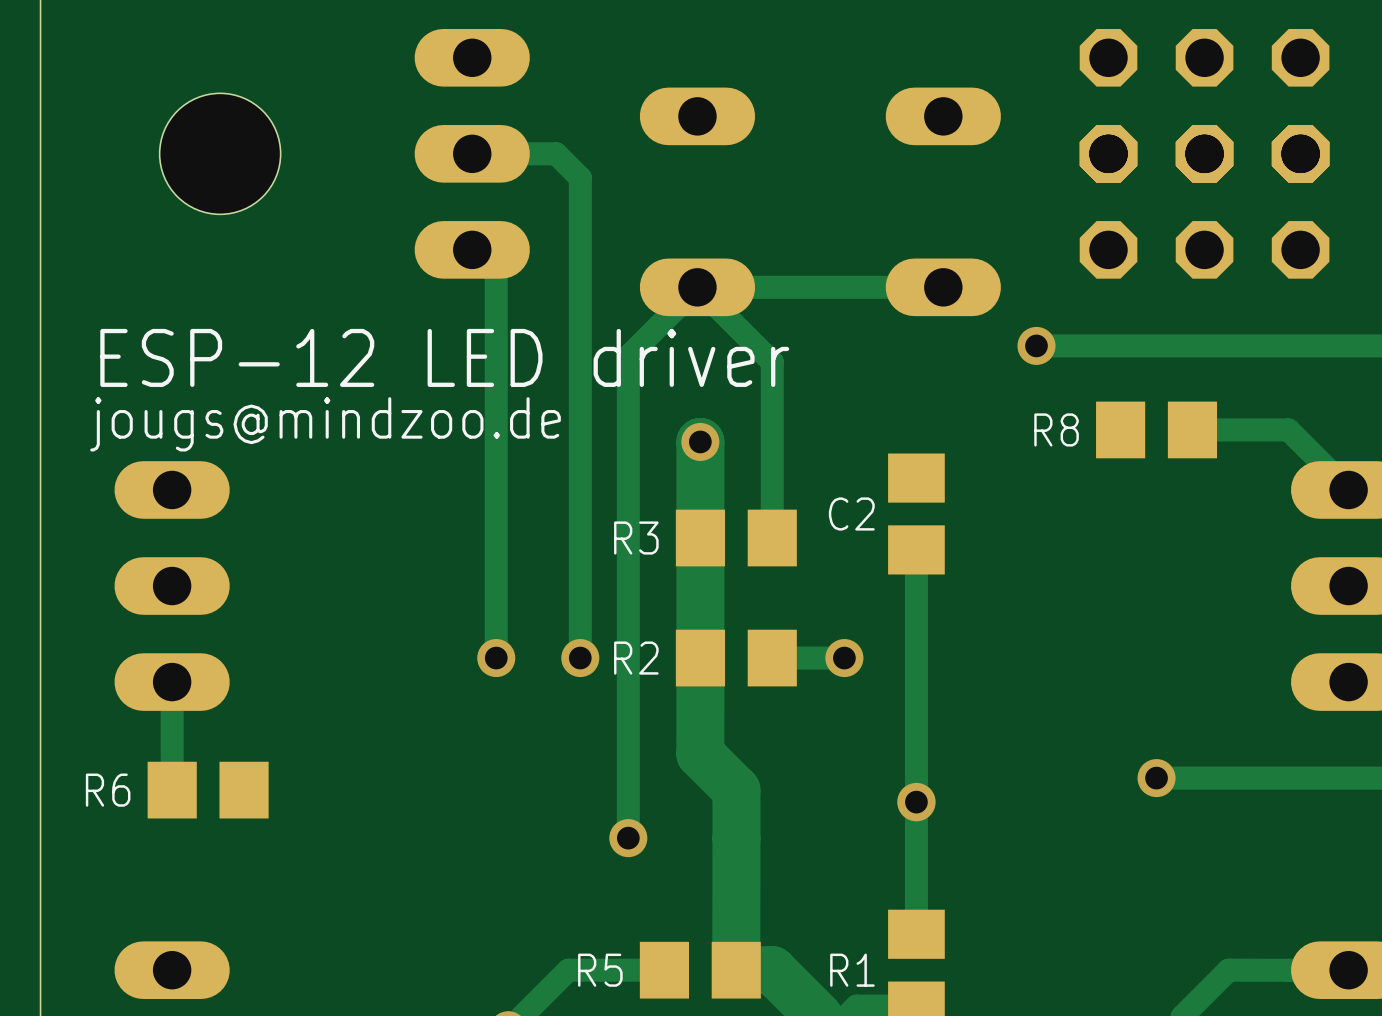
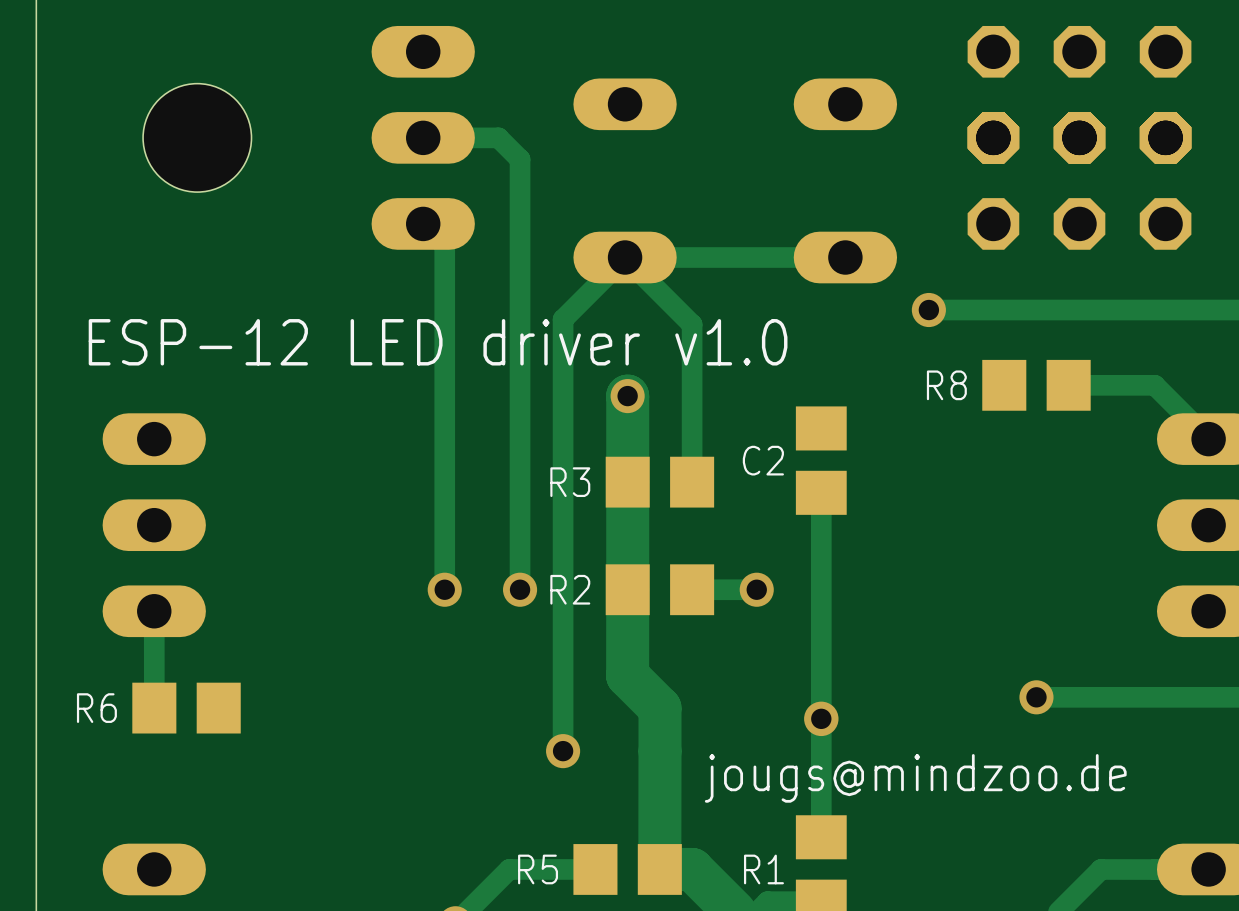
text: ESP-12 LED driver (444, 357) -> ESP-12 LED driver v1.0 (438, 342)
text position: jougs@mindzoo.de (325, 424) -> jougs@mindzoo.de (915, 778)

